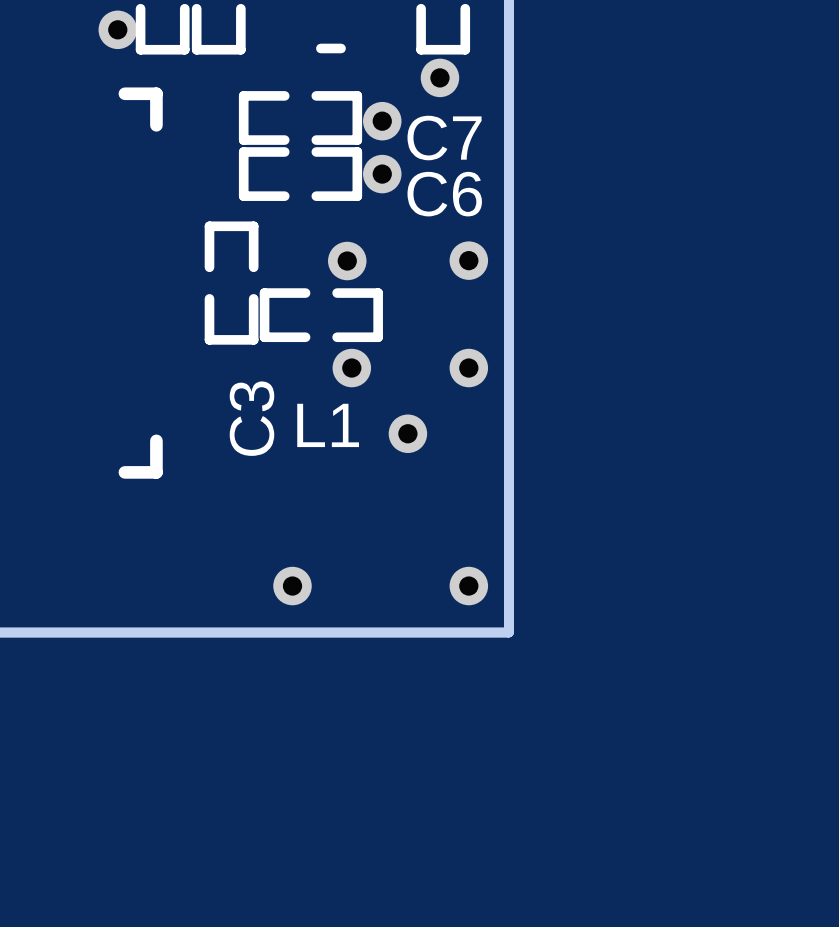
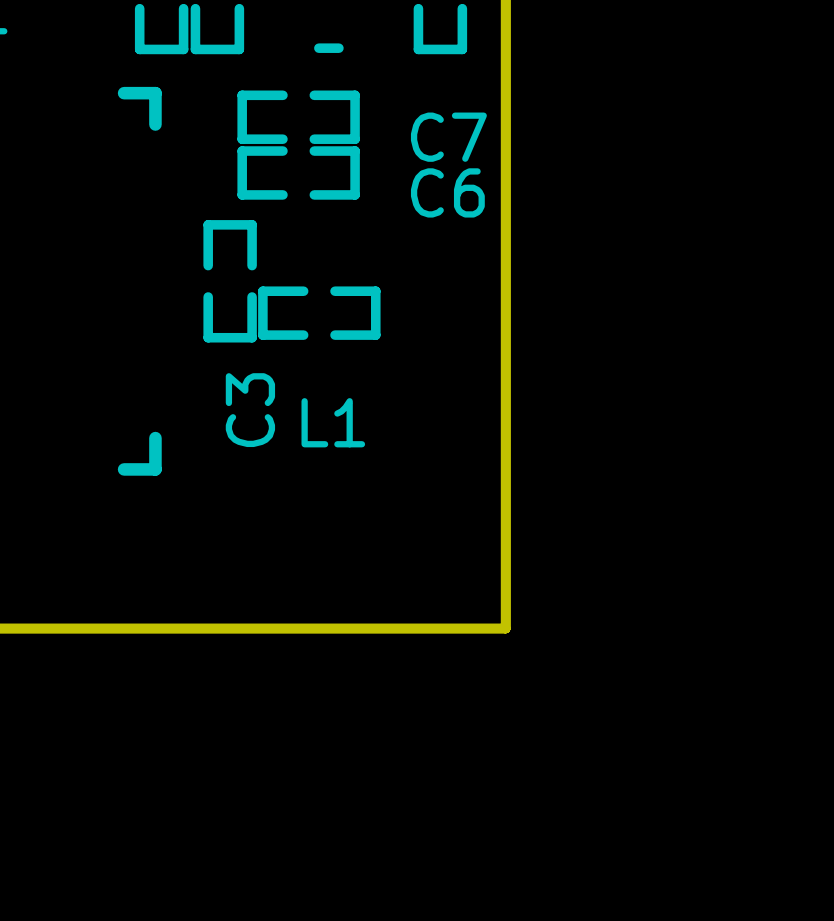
part: (117, 29) -> none
part: (439, 77) -> none
part: (382, 121) -> none
part: (382, 174) -> none
part: (468, 260) -> none
part: (347, 261) -> none
part: (351, 368) -> none
part: (468, 368) -> none
part: (407, 433) -> none
part: (292, 586) -> none
part: (468, 586) -> none

